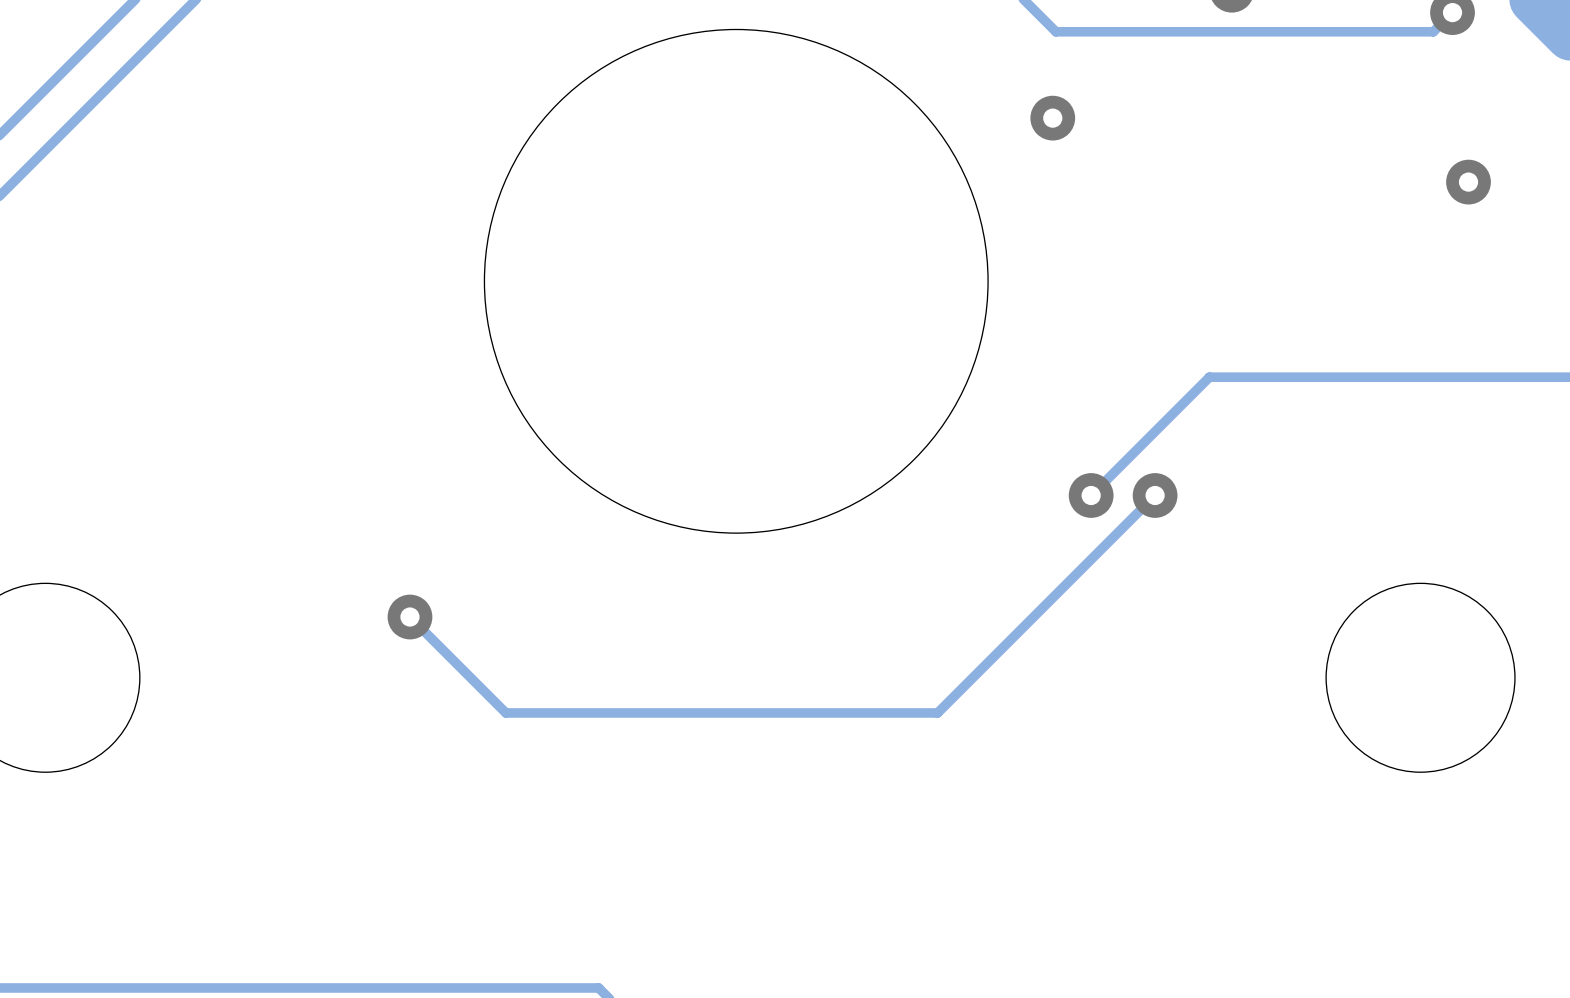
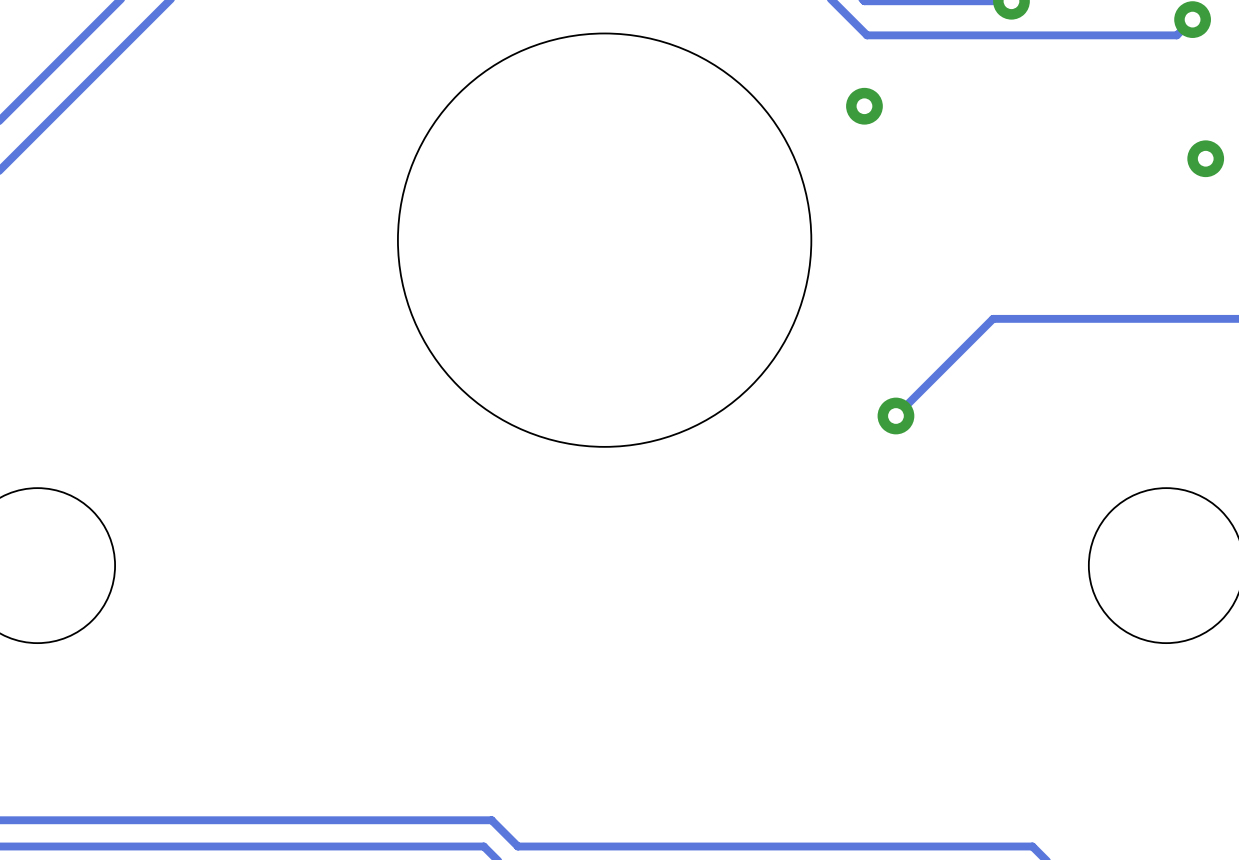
track: (1155, 495) (937, 712) (505, 712) (409, 617) -> none
via: (1155, 495) -> none
via: (409, 617) -> none

